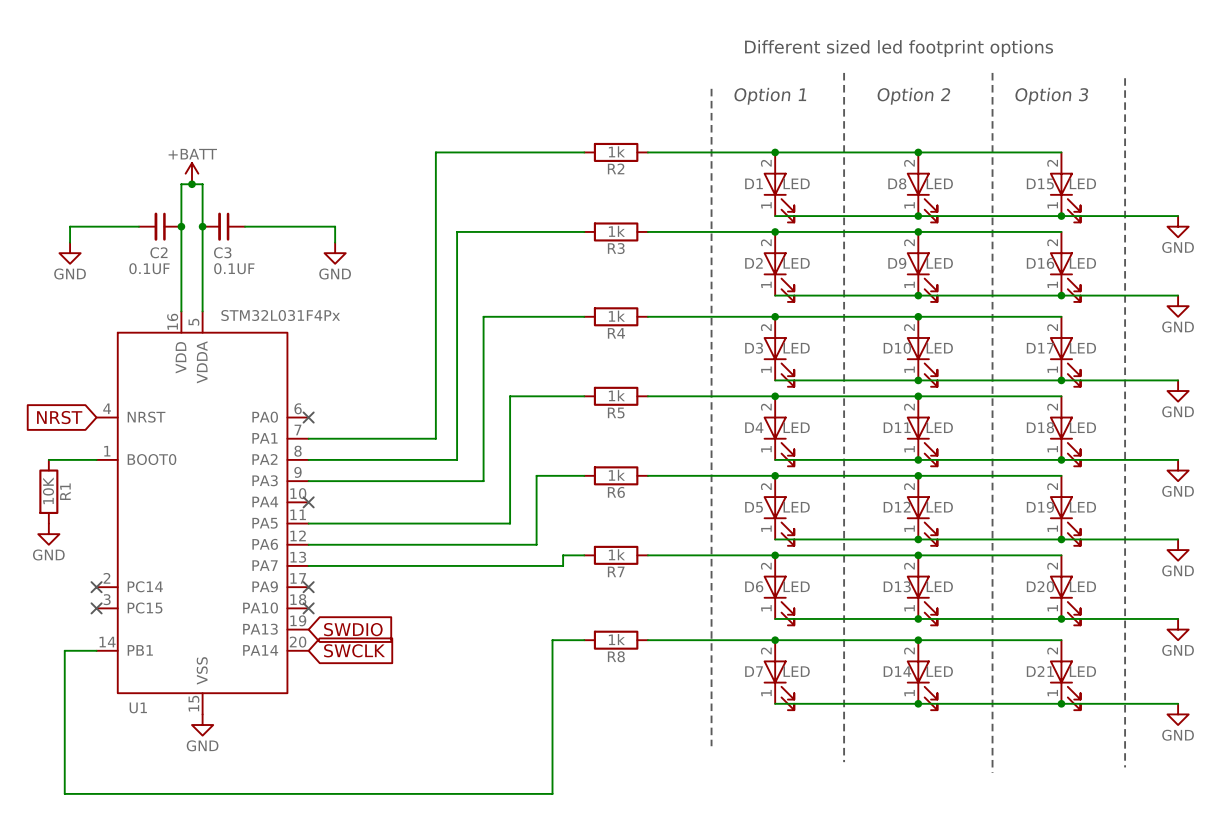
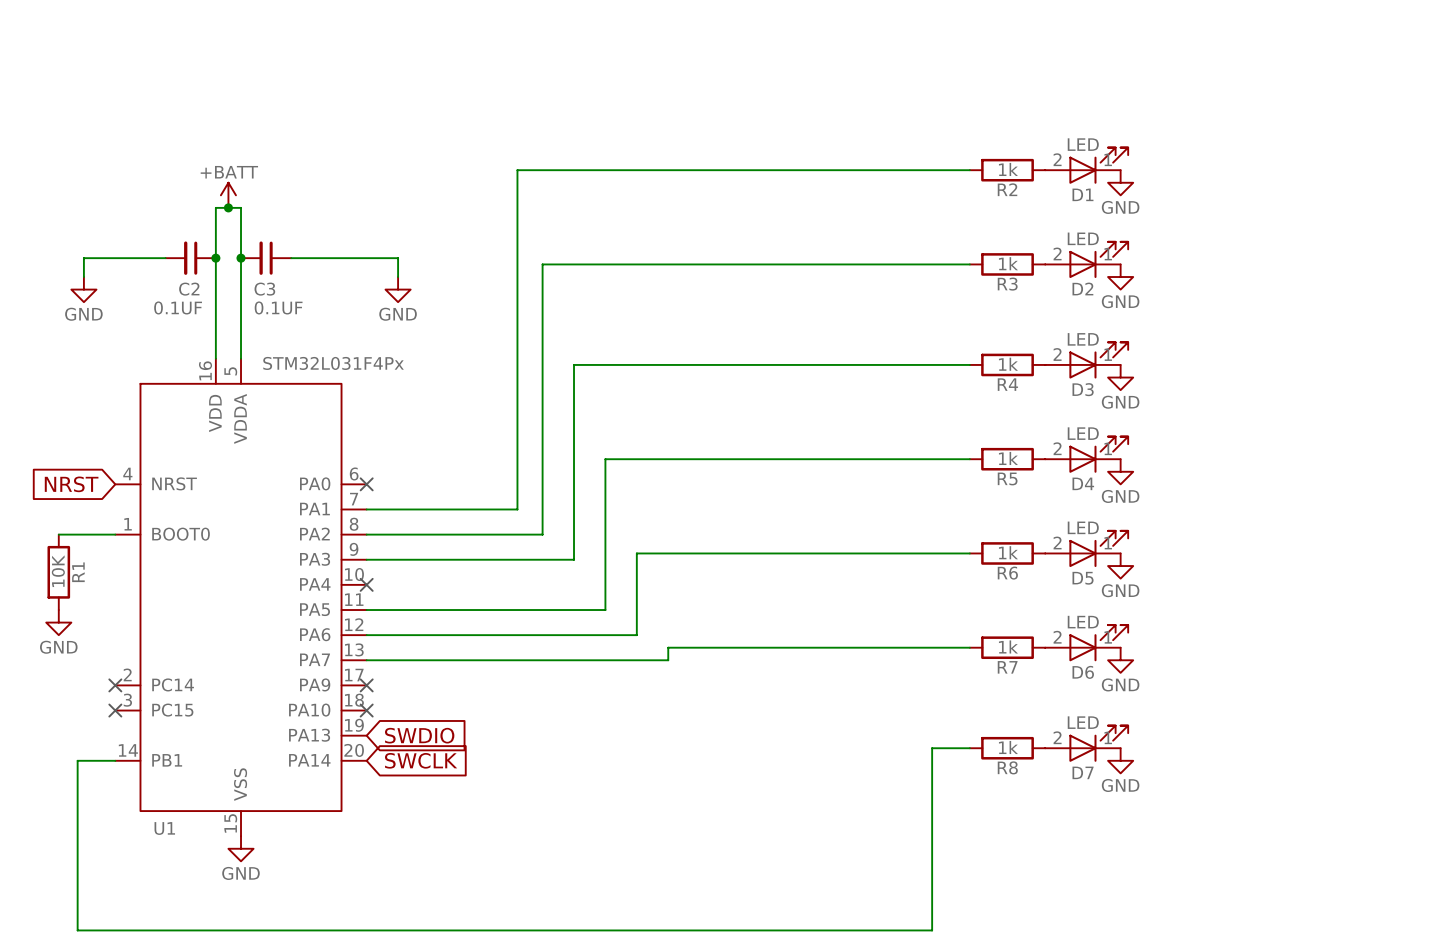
text: Different sized led footprint options (899, 48) -> none
line: (844, 72) (844, 762) -> none
line: (992, 72) (992, 772) -> none
line: (1125, 78) (1125, 767) -> none
line: (711, 88) (711, 746) -> none
text: Option 1 (770, 96) -> none
text: Option 2 (913, 96) -> none
text: Option 3 (1051, 96) -> none
wire: none -> (693, 170) (768, 170)
R2 position: (616, 152) -> (1007, 170)
junction: (775, 152) -> none
wire: (817, 152) (1061, 152) -> none
junction: (918, 152) -> none
power symbol: none -> GND (1120, 182)
D1 position: (778, 187) -> (1086, 165)
D8: LED (922, 187) -> none
D15: LED (1065, 187) -> none
D1 rotation: 0° (778, 197) -> 90° counterclockwise (1098, 165)
wire: (775, 216) (1178, 216) -> none
junction: (918, 216) -> none
junction: (1061, 216) -> none
power symbol: GND (1178, 226) -> none
wire: none -> (693, 264) (768, 264)
R3 position: (616, 231) -> (1007, 264)
junction: (775, 231) -> none
wire: (817, 231) (1061, 231) -> none
junction: (918, 231) -> none
power symbol: none -> GND (1120, 277)
D2 position: (778, 266) -> (1086, 259)
D9: LED (922, 266) -> none
D16: LED (1065, 266) -> none
D2 rotation: 0° (778, 277) -> 90° counterclockwise (1098, 259)
wire: (775, 295) (1178, 295) -> none
junction: (918, 295) -> none
junction: (1061, 295) -> none
power symbol: GND (1178, 306) -> none
wire: none -> (693, 364) (768, 364)
R4 position: (616, 316) -> (1007, 364)
junction: (775, 316) -> none
wire: (817, 316) (1061, 316) -> none
junction: (918, 316) -> none
power symbol: none -> GND (1120, 377)
D3 position: (778, 351) -> (1086, 360)
D10: LED (922, 351) -> none
D17: LED (1065, 351) -> none
D3 rotation: 0° (778, 361) -> 90° counterclockwise (1098, 360)
wire: (775, 380) (1178, 380) -> none
junction: (918, 380) -> none
junction: (1061, 380) -> none
power symbol: GND (1178, 391) -> none
wire: none -> (693, 459) (768, 459)
R5 position: (616, 396) -> (1007, 459)
junction: (775, 396) -> none
wire: (817, 396) (1061, 396) -> none
junction: (918, 396) -> none
power symbol: none -> GND (1120, 471)
D4 position: (778, 431) -> (1086, 454)
D11: LED (922, 431) -> none
D18: LED (1065, 431) -> none
D4 rotation: 0° (778, 441) -> 90° counterclockwise (1098, 454)
wire: (775, 459) (1178, 459) -> none
junction: (918, 459) -> none
junction: (1061, 459) -> none
power symbol: GND (1178, 470) -> none
wire: none -> (693, 553) (768, 553)
R6 position: (616, 475) -> (1007, 553)
junction: (775, 475) -> none
wire: (817, 475) (1061, 475) -> none
junction: (918, 475) -> none
power symbol: none -> GND (1120, 566)
D5 position: (778, 510) -> (1086, 548)
D12: LED (922, 510) -> none
D19: LED (1065, 510) -> none
D5 rotation: 0° (778, 521) -> 90° counterclockwise (1098, 548)
wire: (775, 539) (1178, 539) -> none
junction: (918, 539) -> none
junction: (1061, 539) -> none
power symbol: GND (1178, 550) -> none
wire: none -> (693, 647) (768, 647)
R7 position: (616, 555) -> (1007, 647)
junction: (775, 555) -> none
wire: (817, 555) (1061, 555) -> none
junction: (918, 555) -> none
power symbol: none -> GND (1120, 660)
D6 position: (778, 590) -> (1086, 643)
D13: LED (922, 590) -> none
D20: LED (1065, 590) -> none
D6 rotation: 0° (778, 600) -> 90° counterclockwise (1098, 643)
wire: (775, 618) (1178, 618) -> none
junction: (918, 618) -> none
junction: (1061, 618) -> none
power symbol: GND (1178, 629) -> none
wire: (584, 640) (552, 640) (552, 793) -> none
R8 position: (616, 640) -> (1007, 748)
wire: (647, 640) (785, 640) -> (655, 930) (932, 930) (932, 748)
junction: (775, 640) -> none
wire: (817, 640) (1061, 640) -> none
junction: (918, 640) -> none
power symbol: none -> GND (1120, 760)
D7 position: (778, 675) -> (1086, 743)
D14: LED (922, 675) -> none
D21: LED (1065, 675) -> none
D7 rotation: 0° (778, 685) -> 90° counterclockwise (1098, 743)
wire: (775, 703) (1178, 703) -> none
junction: (918, 703) -> none
junction: (1061, 703) -> none
power symbol: GND (1178, 714) -> none

